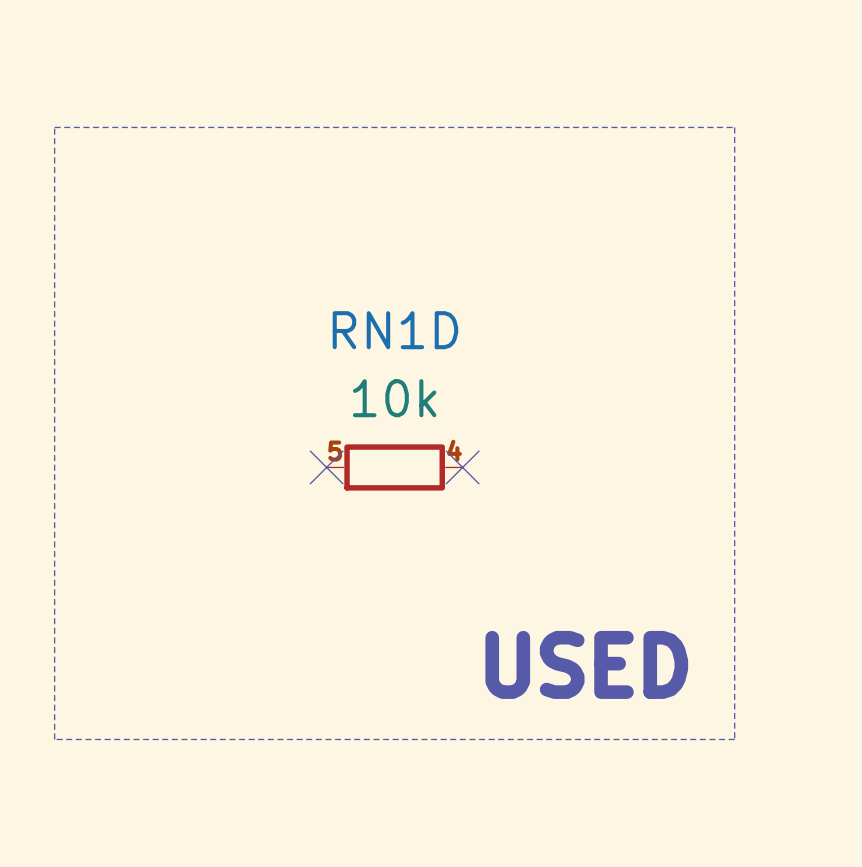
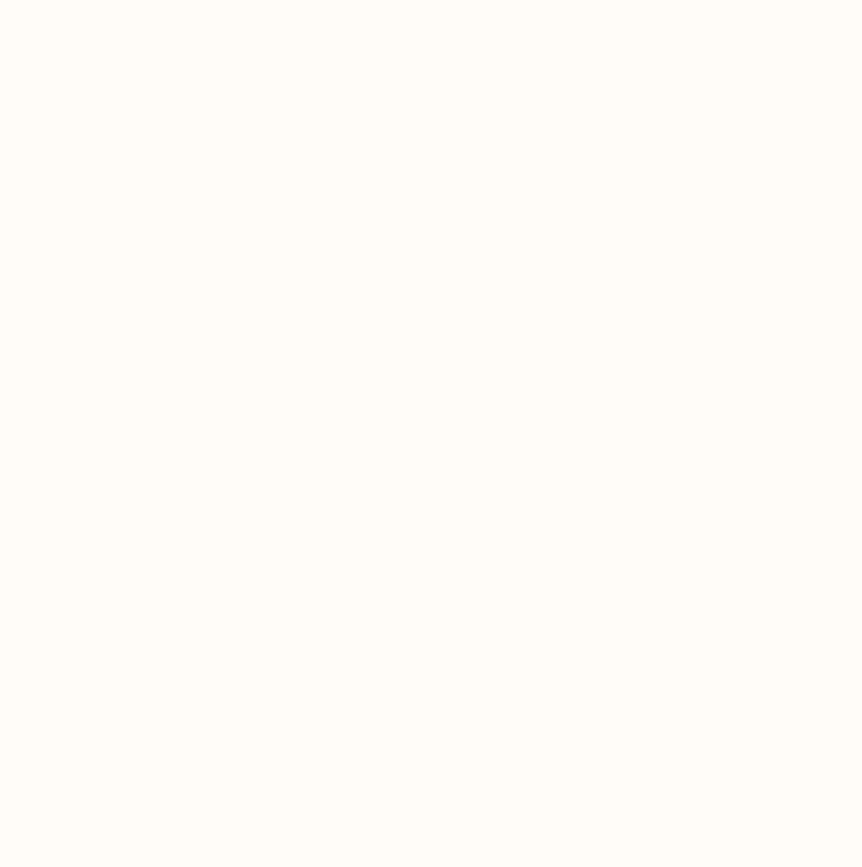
line: (54, 127) (734, 127) (734, 739) (54, 739) (54, 127) -> none
no-connect mark: (326, 467) -> none
RN1D: 10k (394, 467) -> none
no-connect mark: (462, 467) -> none
text: USED (586, 664) -> none

